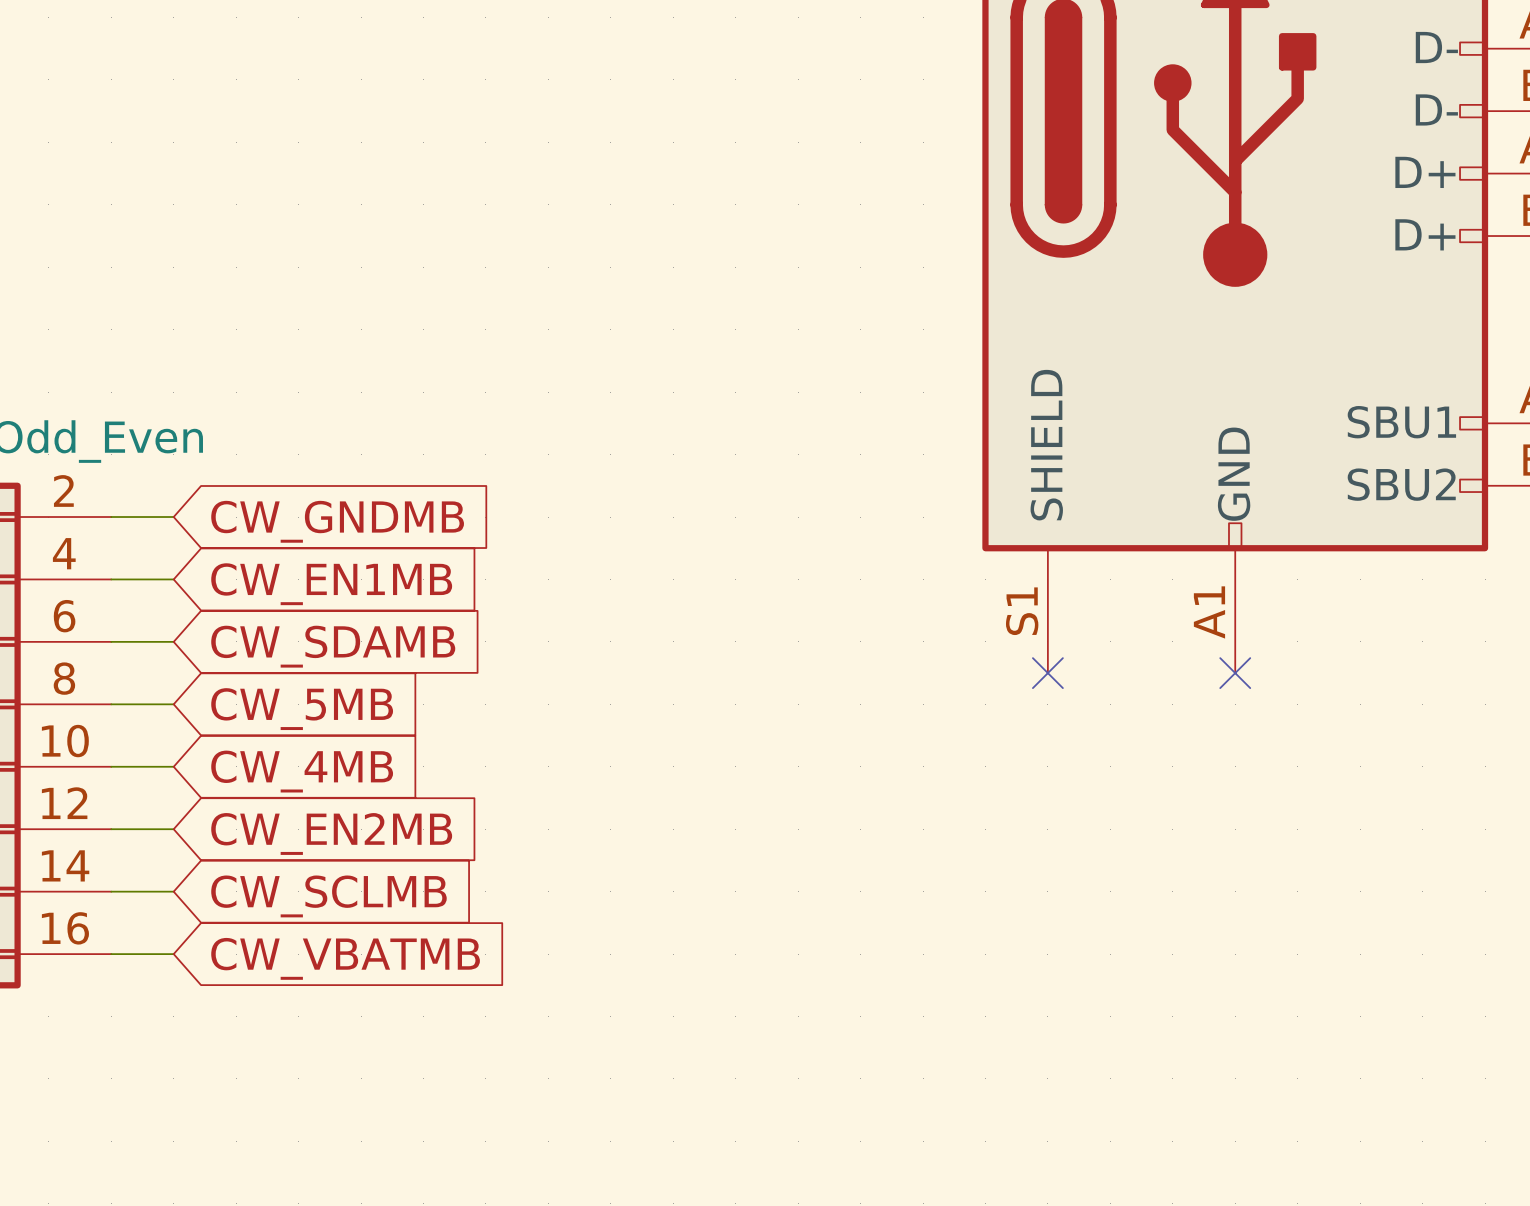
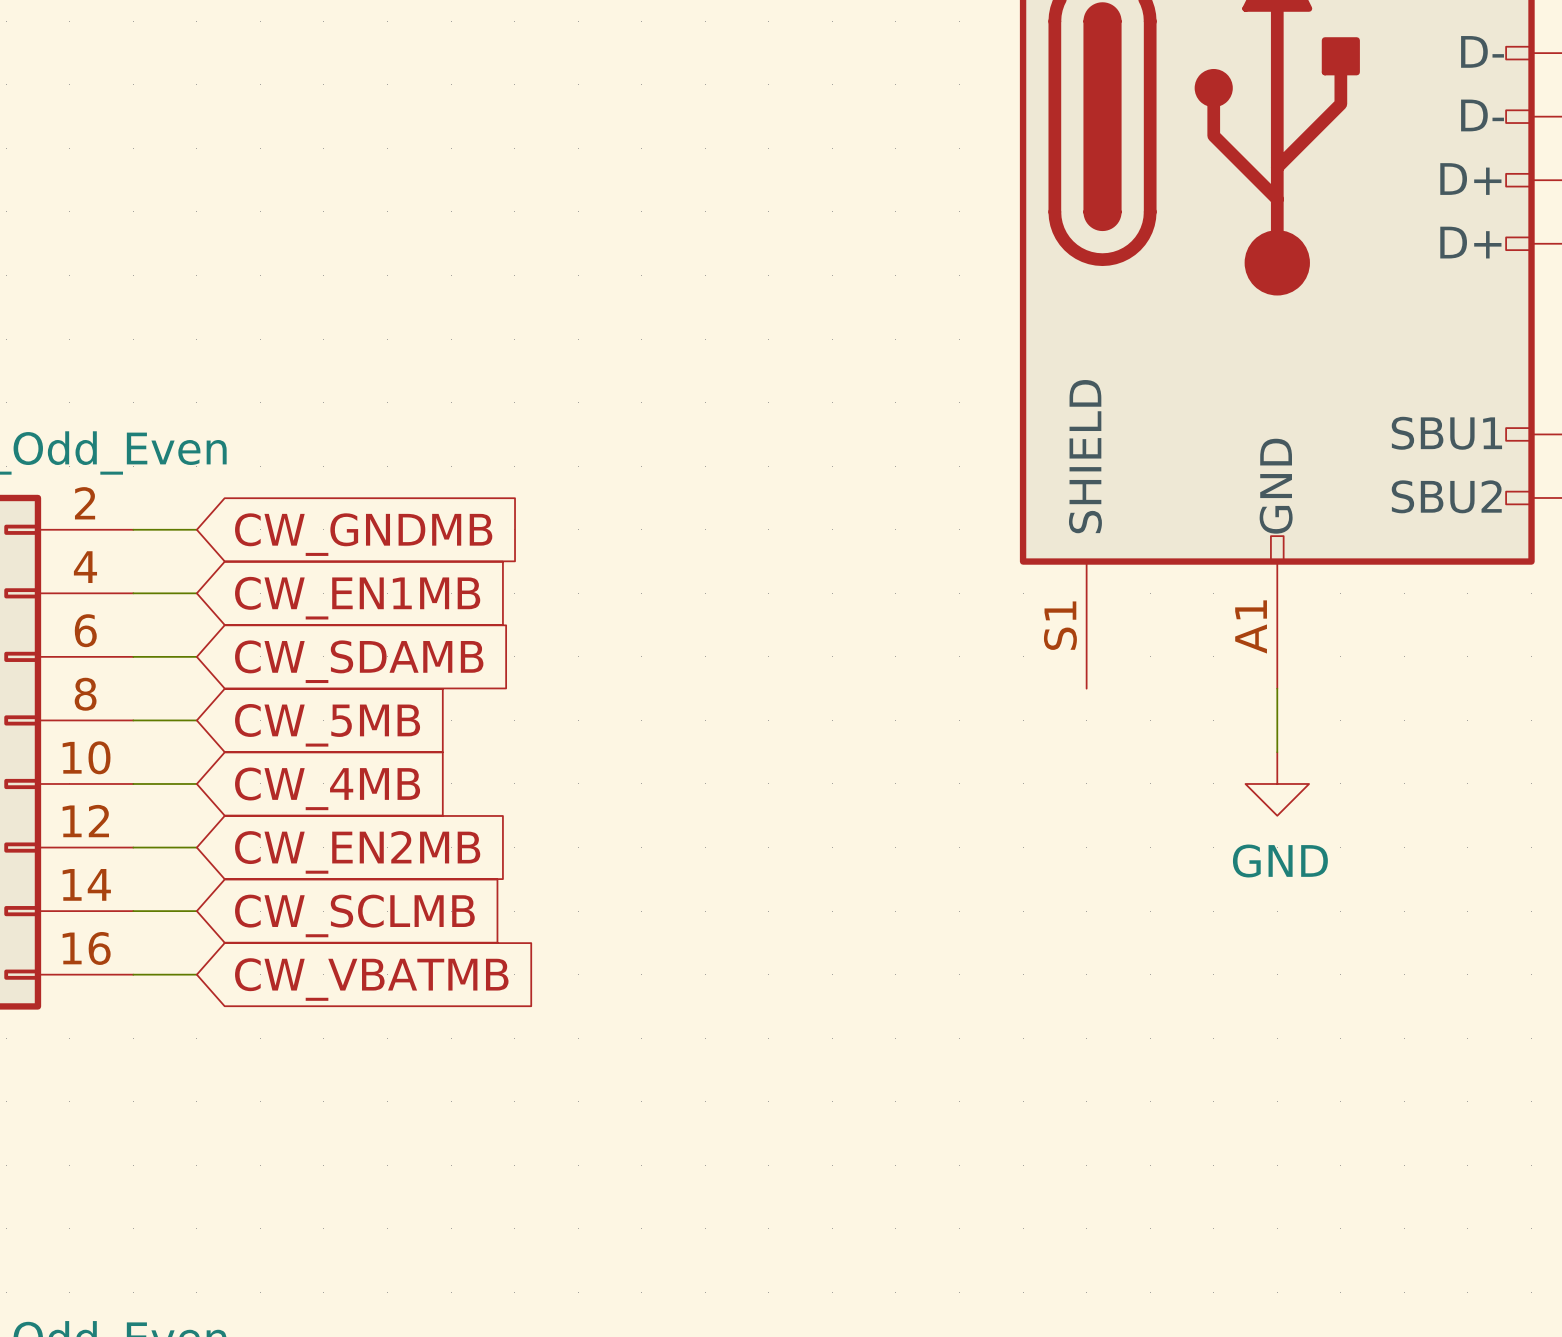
no-connect mark: (1047, 673) -> none
wire: none -> (1277, 688) (1277, 752)
no-connect mark: (1235, 673) -> none
power symbol: none -> GND (1277, 783)

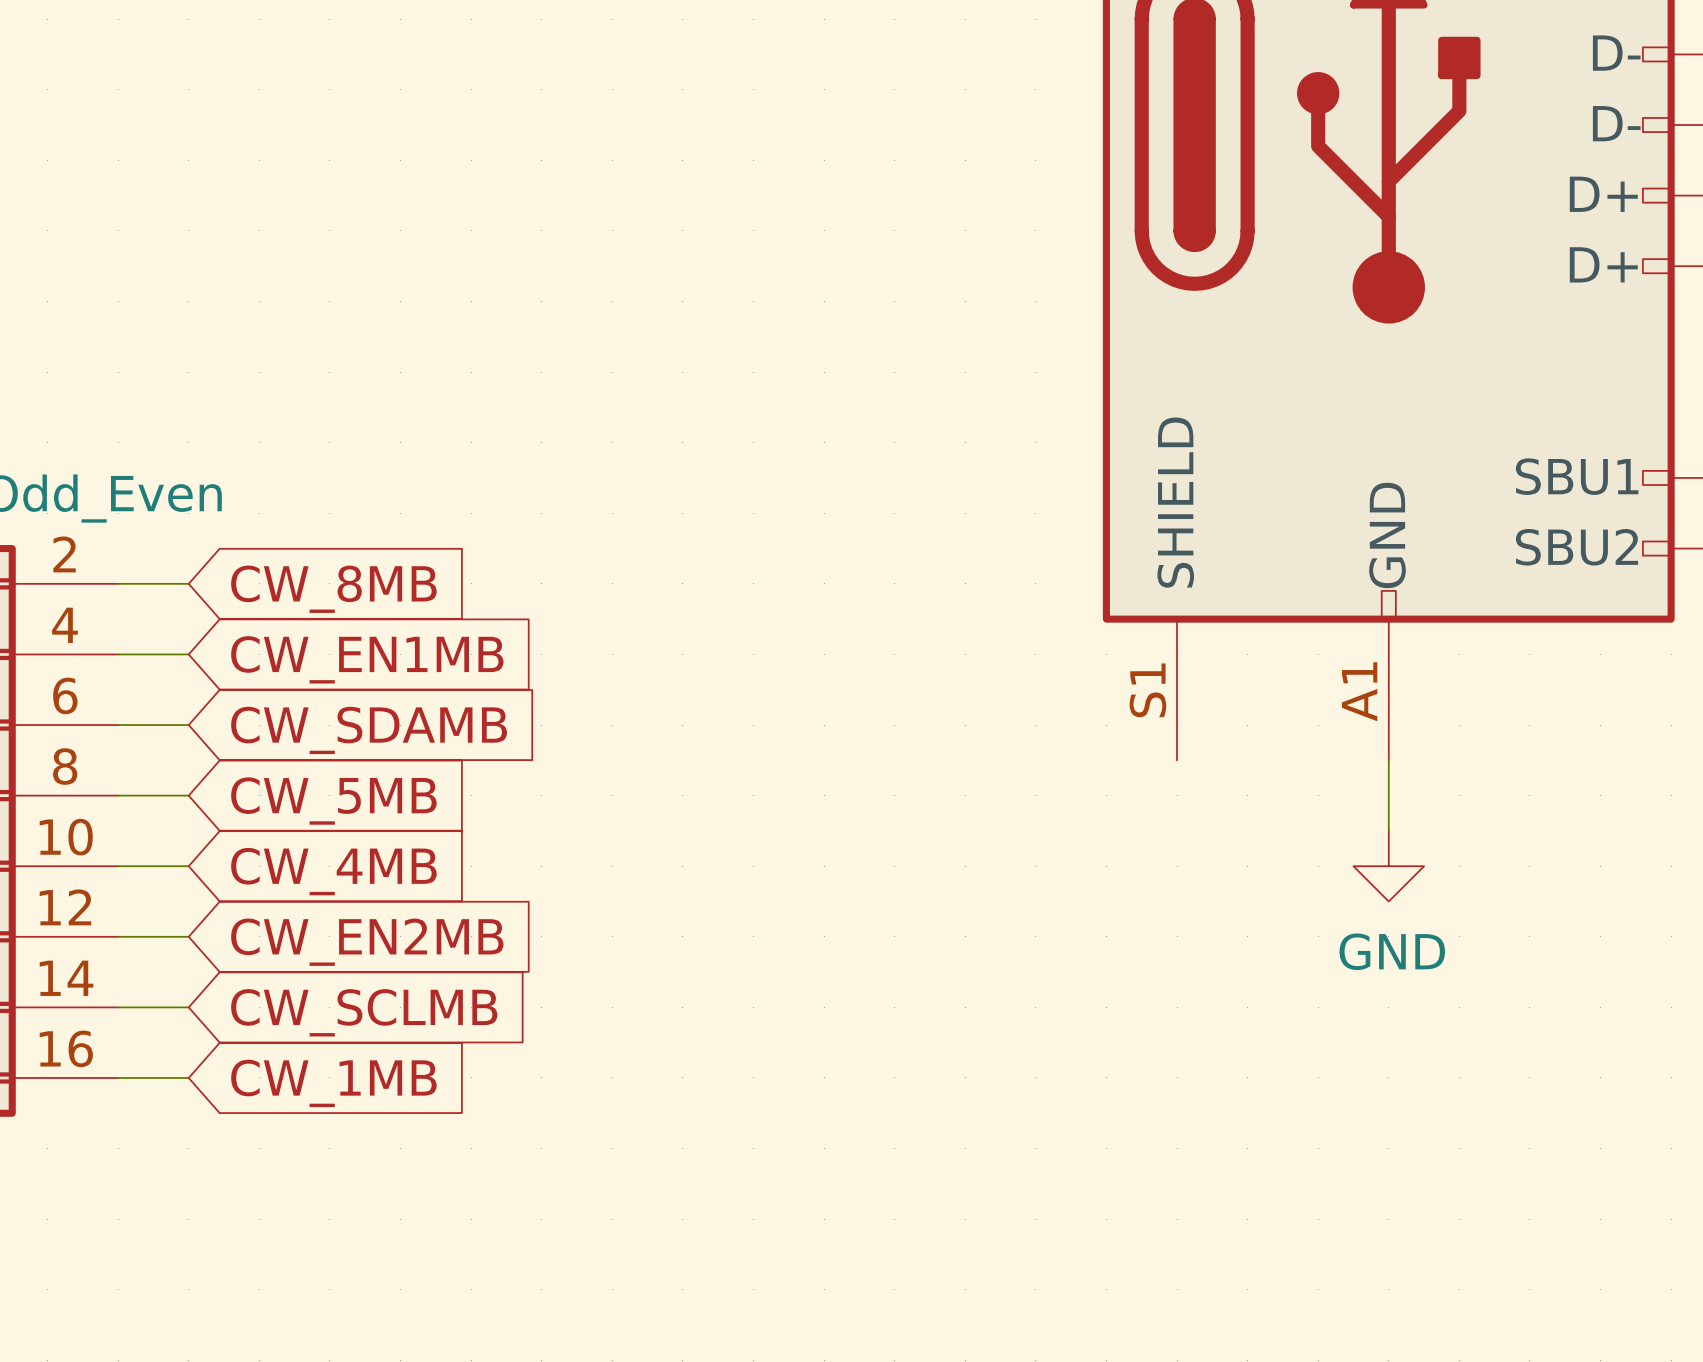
global label: CW_GNDMB (363, 534) -> CW_8MB (333, 589)
global label: CW_VBATMB (371, 979) -> CW_1MB (333, 1083)

